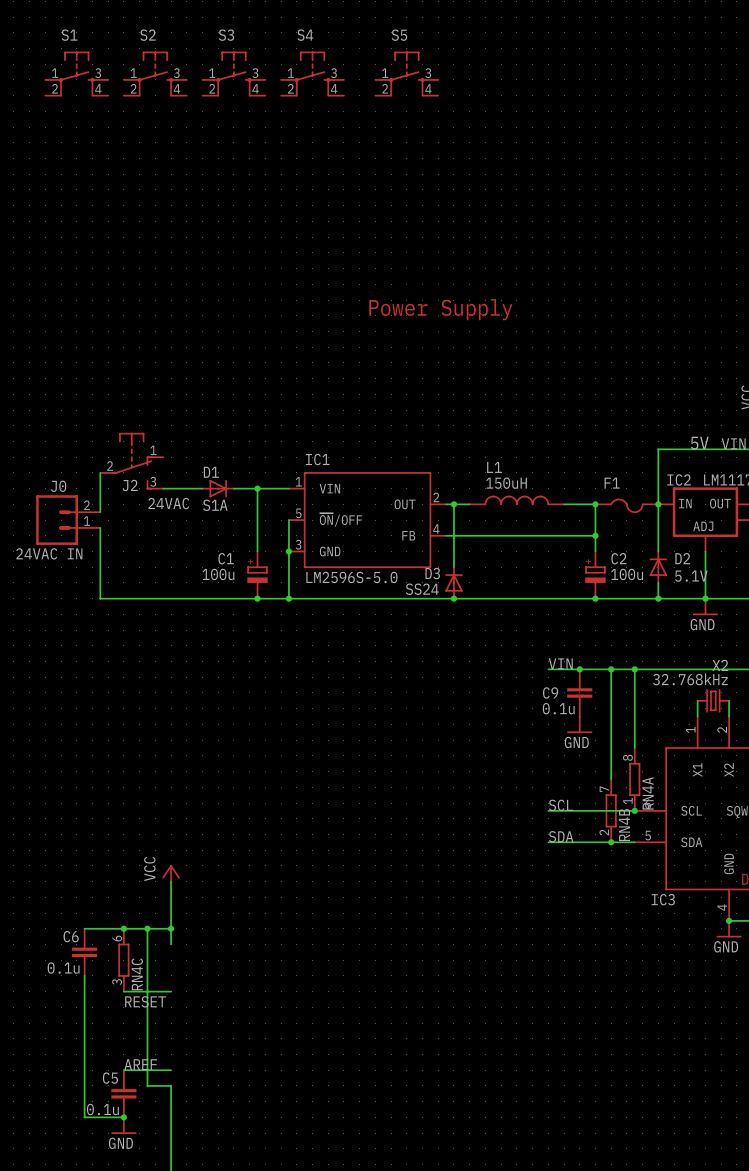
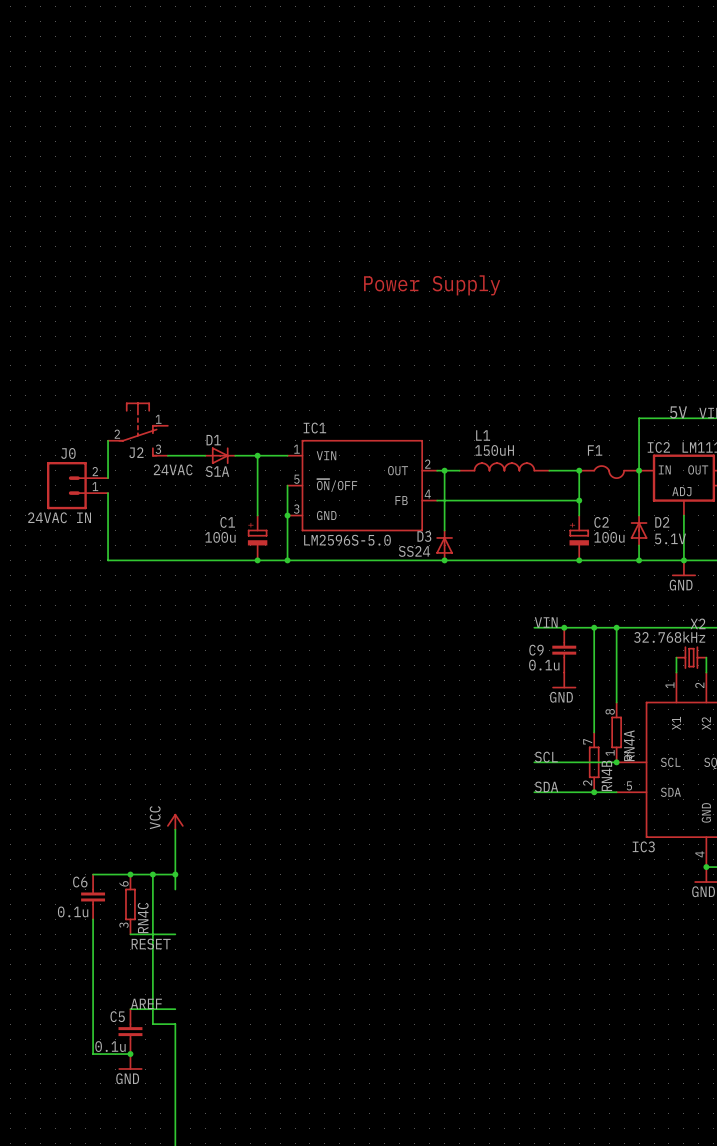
S1: (76, 73) -> none
S2: (155, 73) -> none
S3: (233, 73) -> none
S4: (312, 73) -> none
S5: (406, 73) -> none

